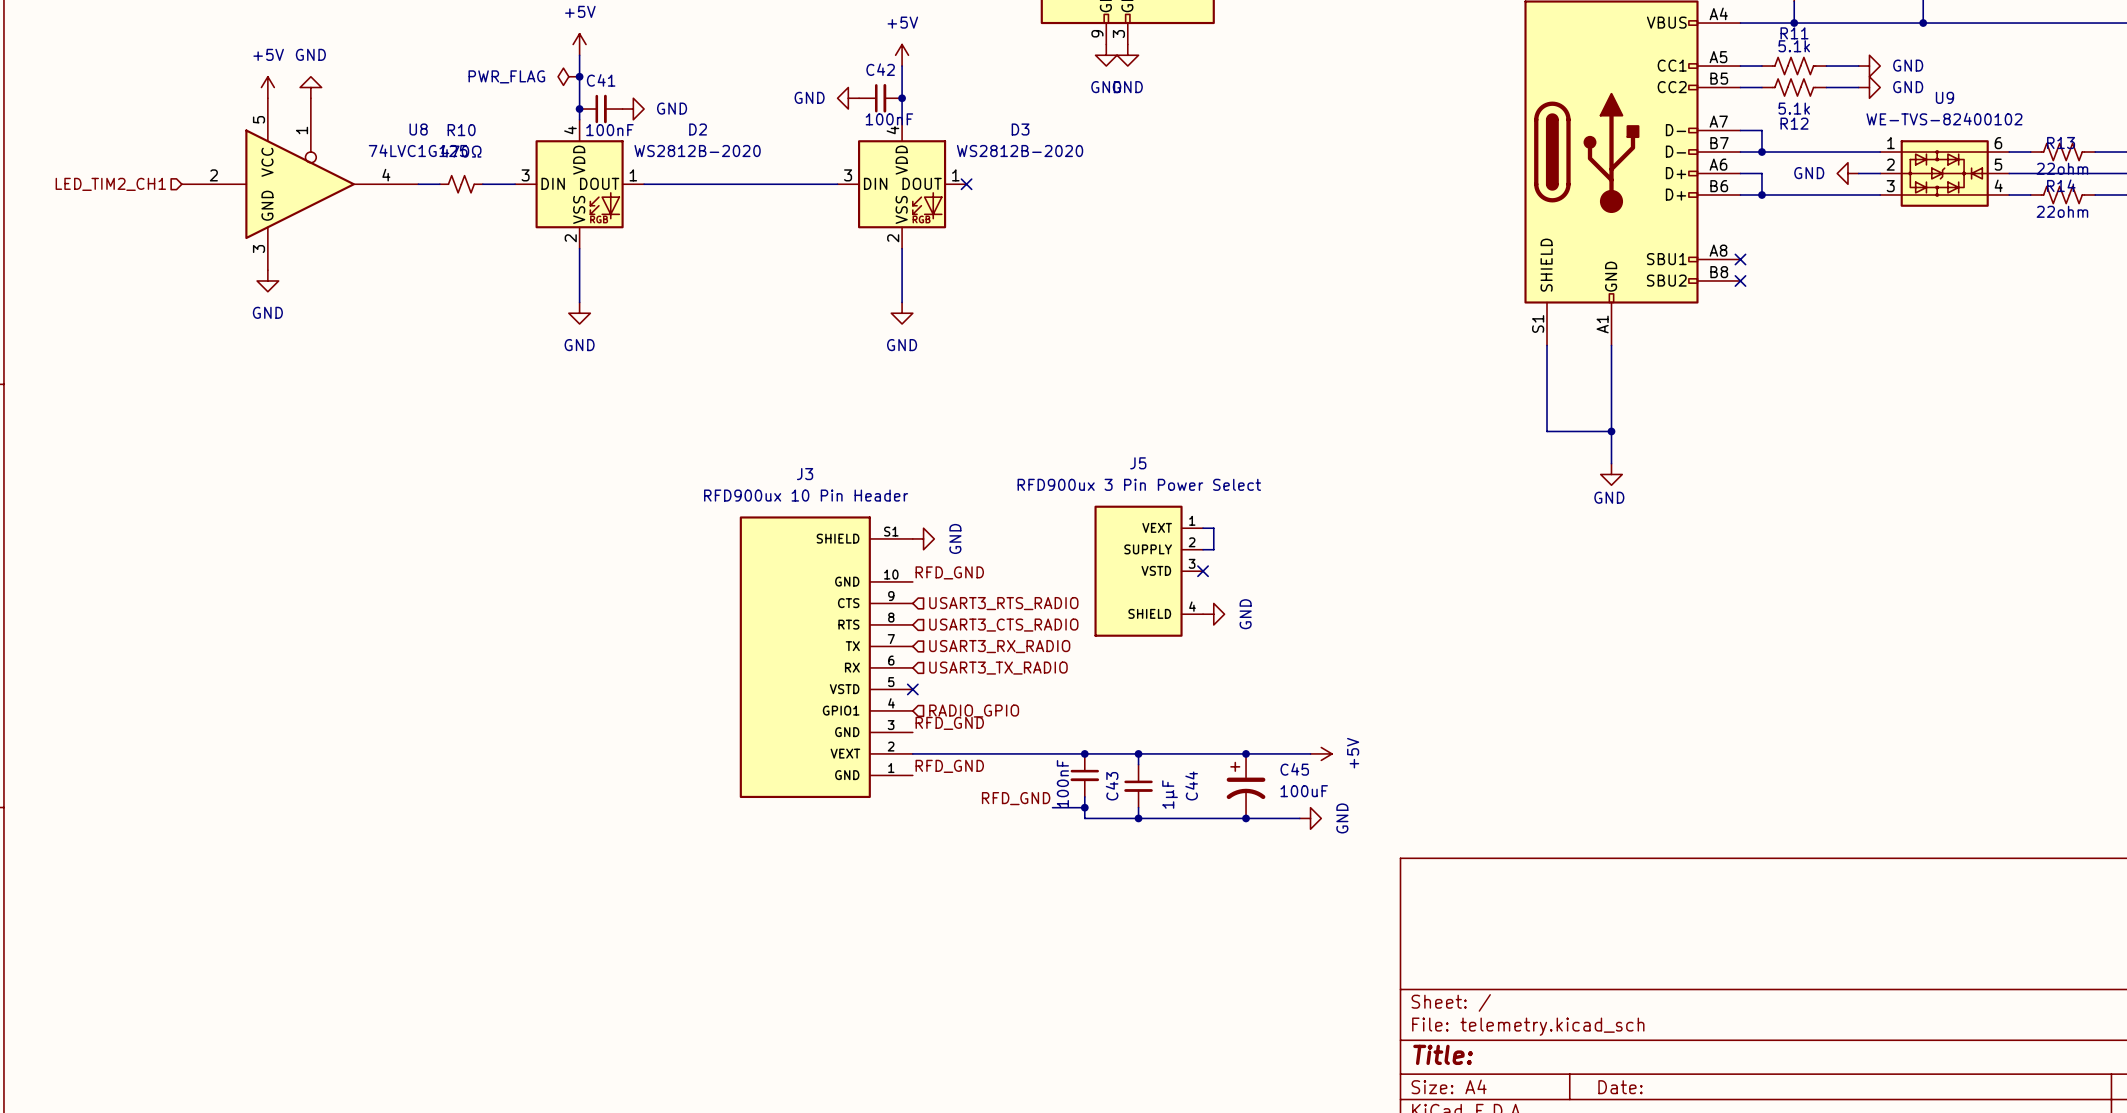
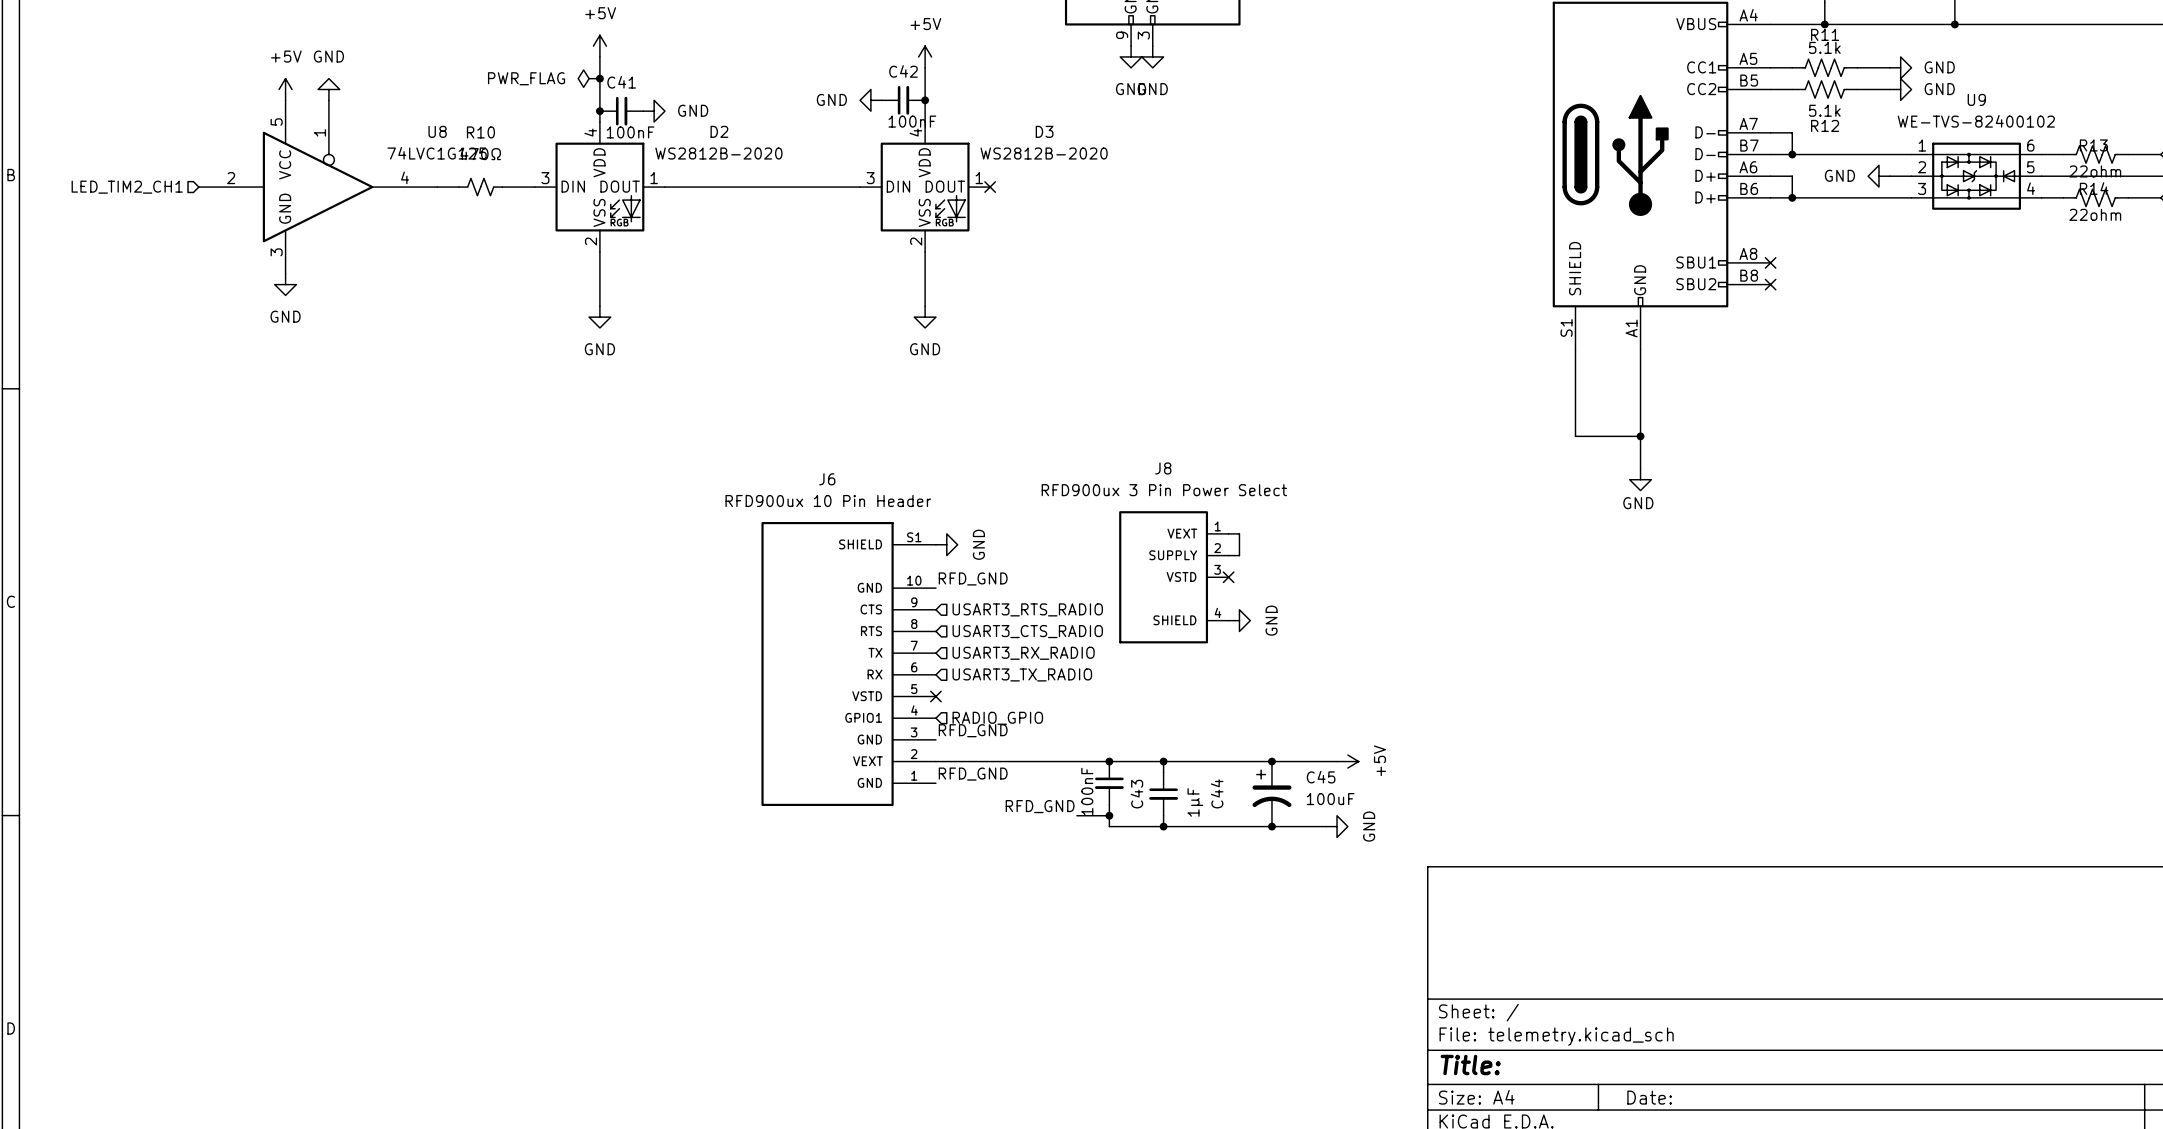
J5 name: J5 (1138, 463) -> J8 (1163, 468)
J3 name: J3 (805, 474) -> J6 (827, 479)

